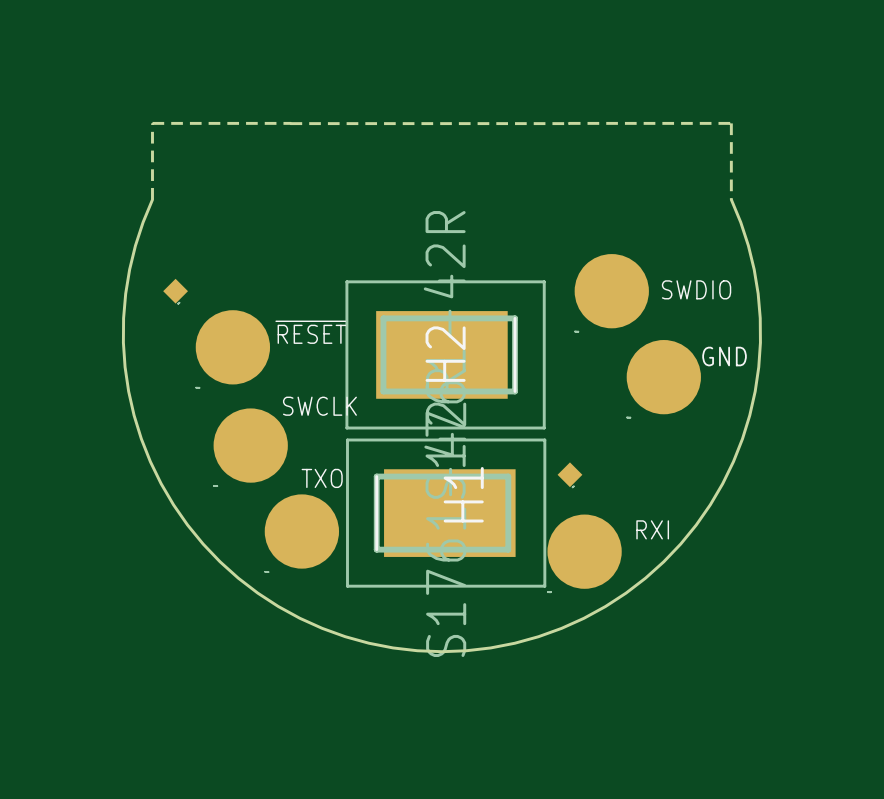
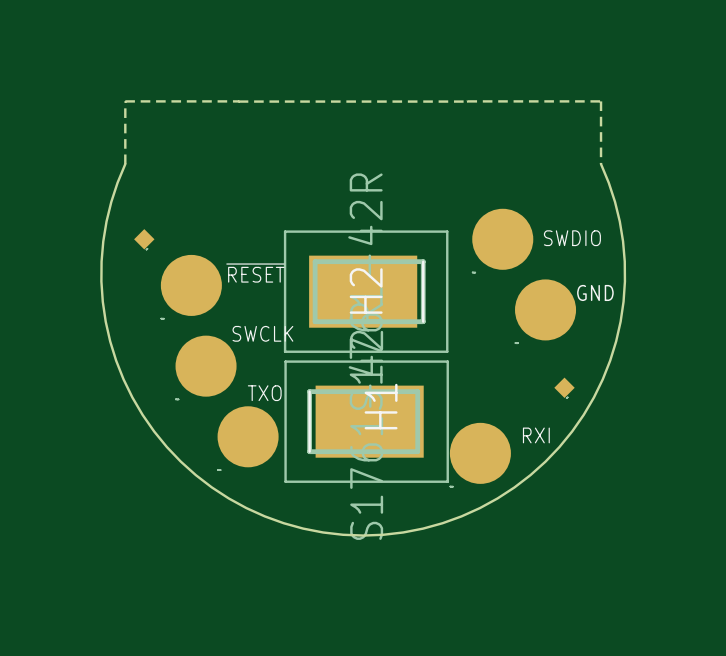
part position: (569, 474) -> (564, 387)

